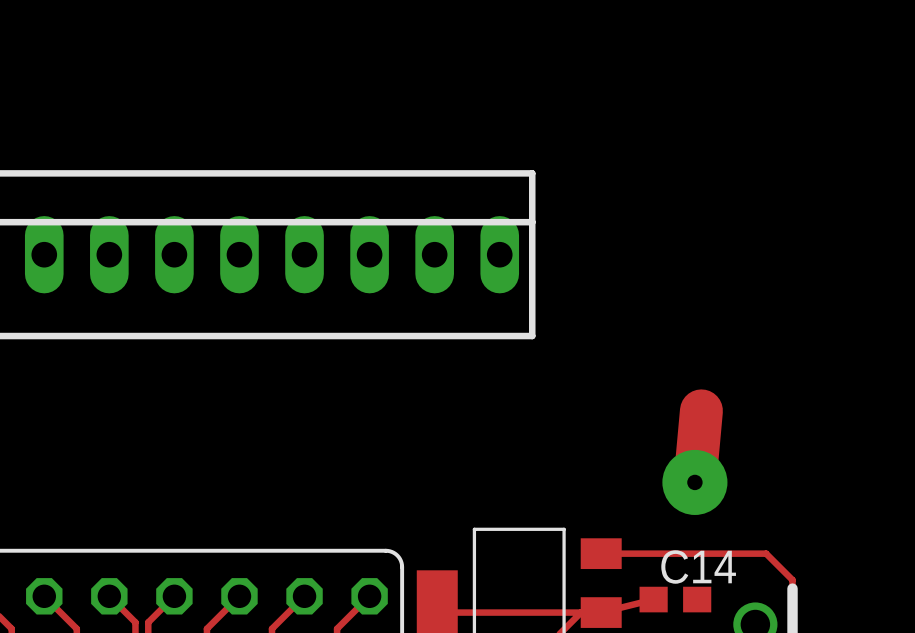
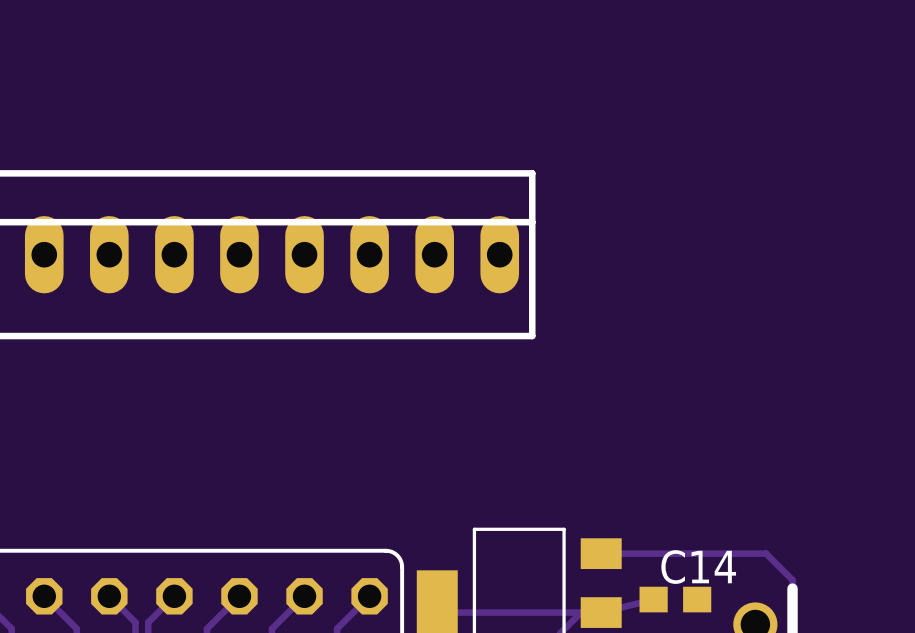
track: (701, 410) (694, 482) -> none
via: (694, 482) -> none

